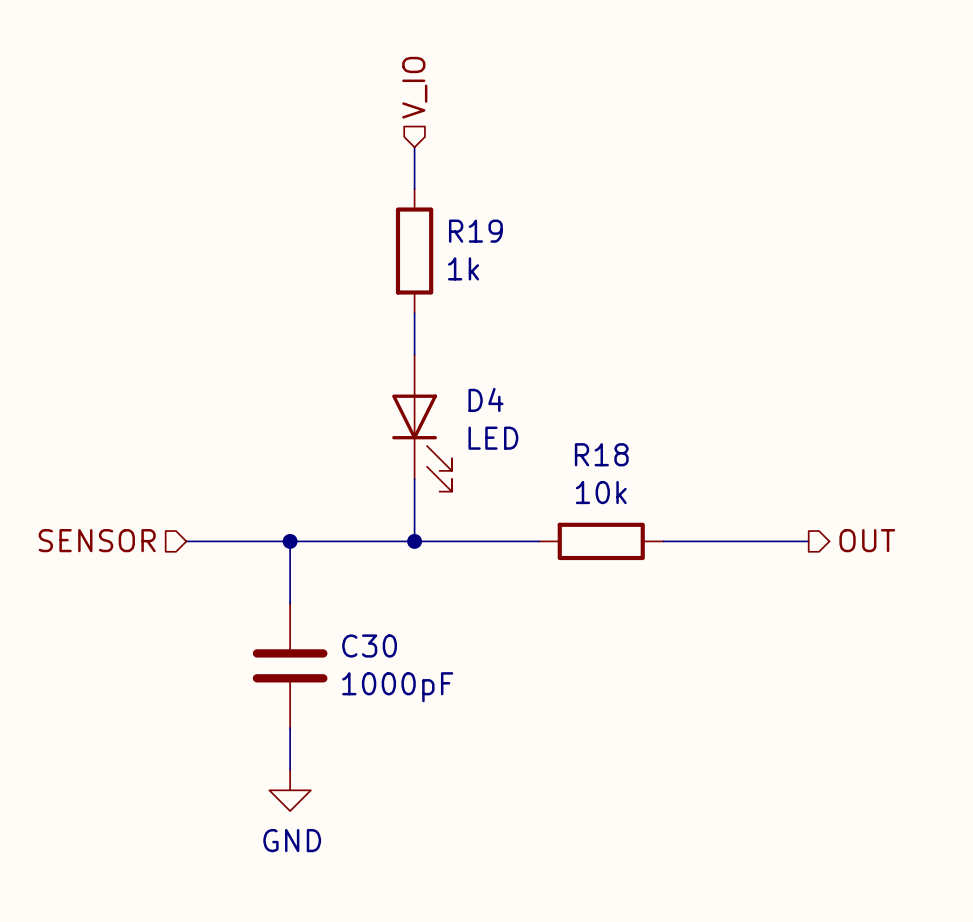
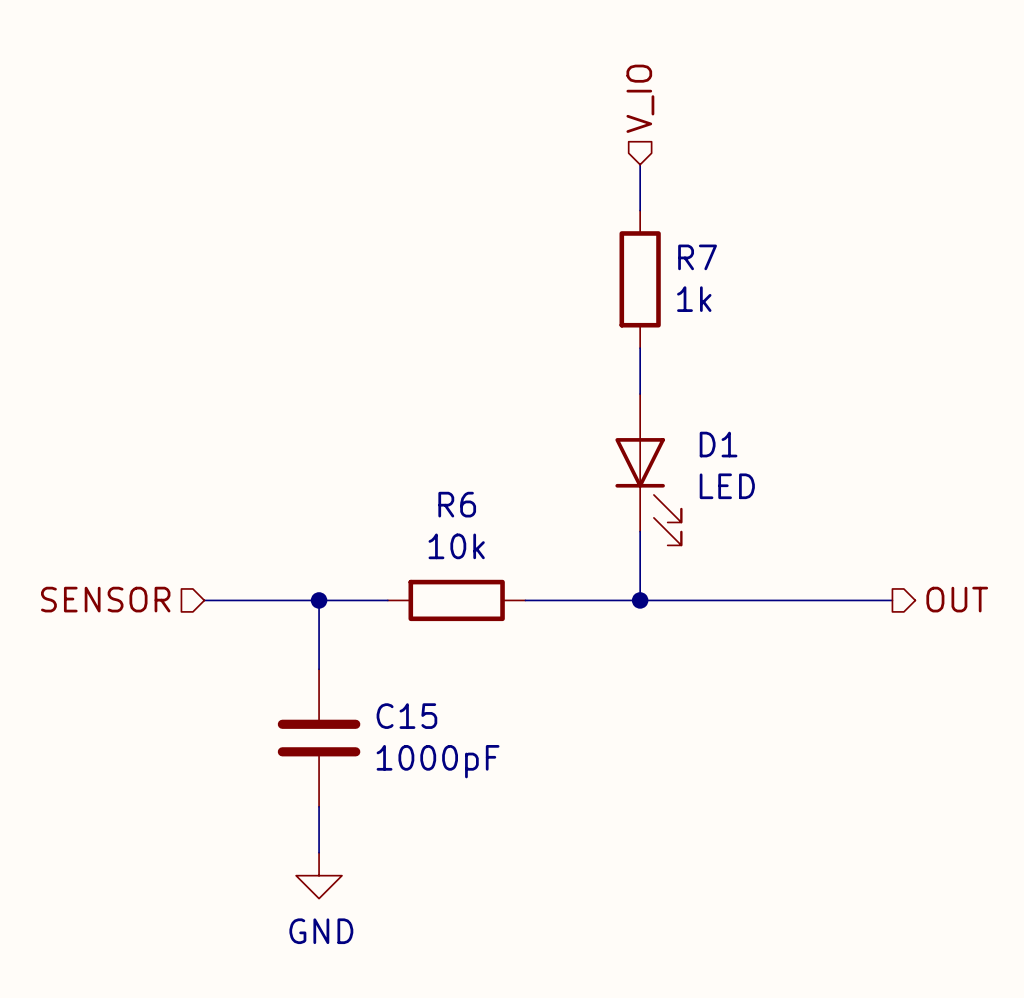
hierarchical label position: V_IO (414, 87) -> V_IO (640, 98)
wire: (414, 147) (414, 188) -> (640, 164) (640, 210)
R19: 1k (414, 251) -> none
R7: none -> 1k (640, 279)
wire: (414, 313) (414, 354) -> (640, 348) (640, 394)
D4: LED (422, 423) -> none
D1: none -> LED (648, 469)
wire: (414, 479) (414, 541) -> (640, 531) (640, 600)
wire: (352, 541) (476, 541) -> (594, 600) (731, 600)
R6: none -> 10k (456, 600)
junction: (414, 541) -> none
junction: none -> (640, 600)
R18: 10k (601, 541) -> none
C30 name: C30 (369, 646) -> C15 (406, 716)

